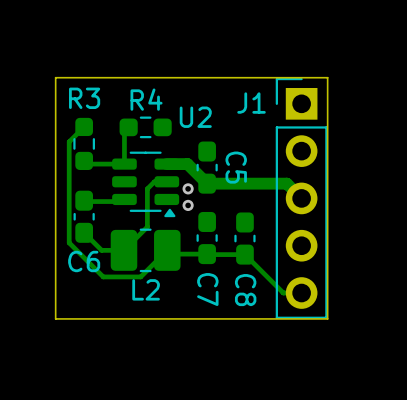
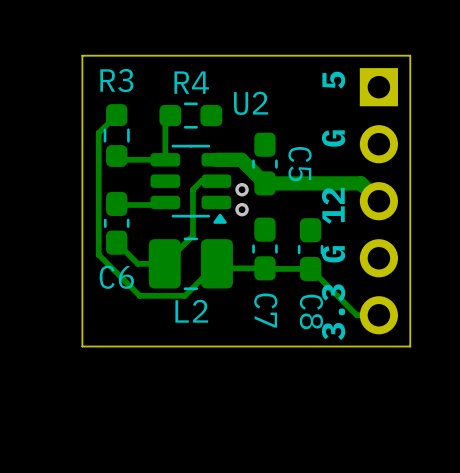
J1 side: bottom (301, 198) -> top (378, 201)
text: none -> 3.3 G 12 G 5 (333, 205)

